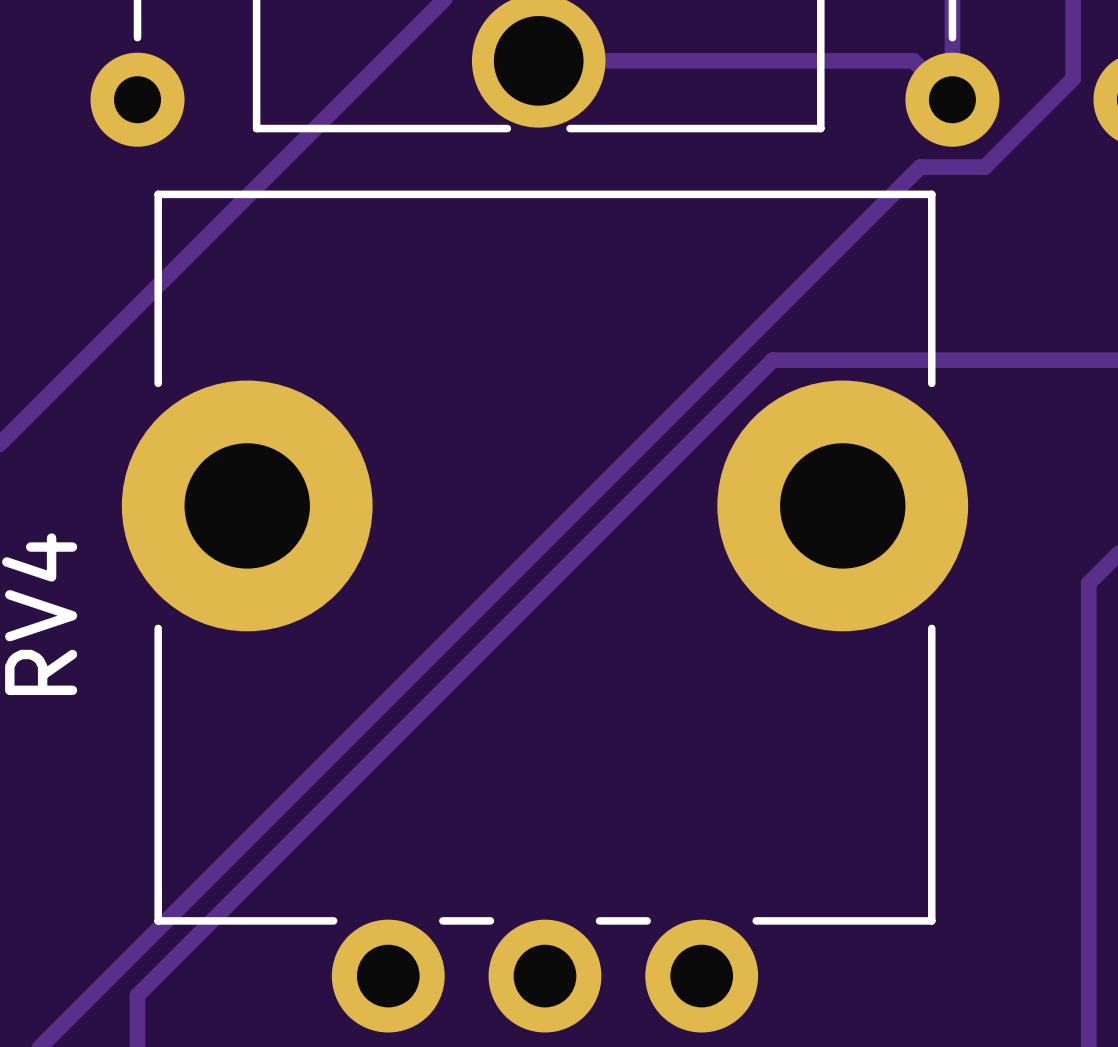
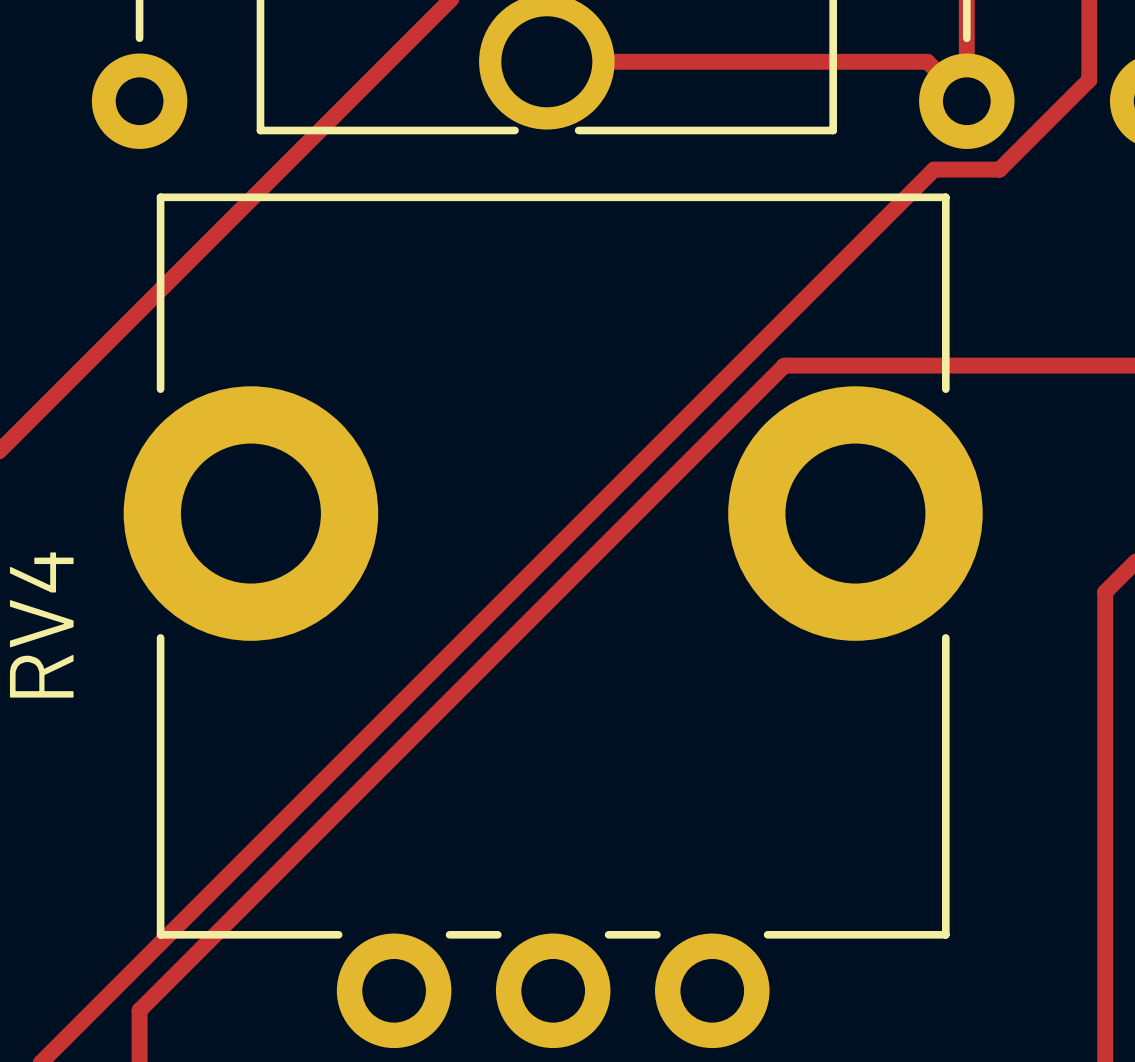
RV4 footprint: [121, 190, 969, 1033] -> [123, 193, 983, 1049]

